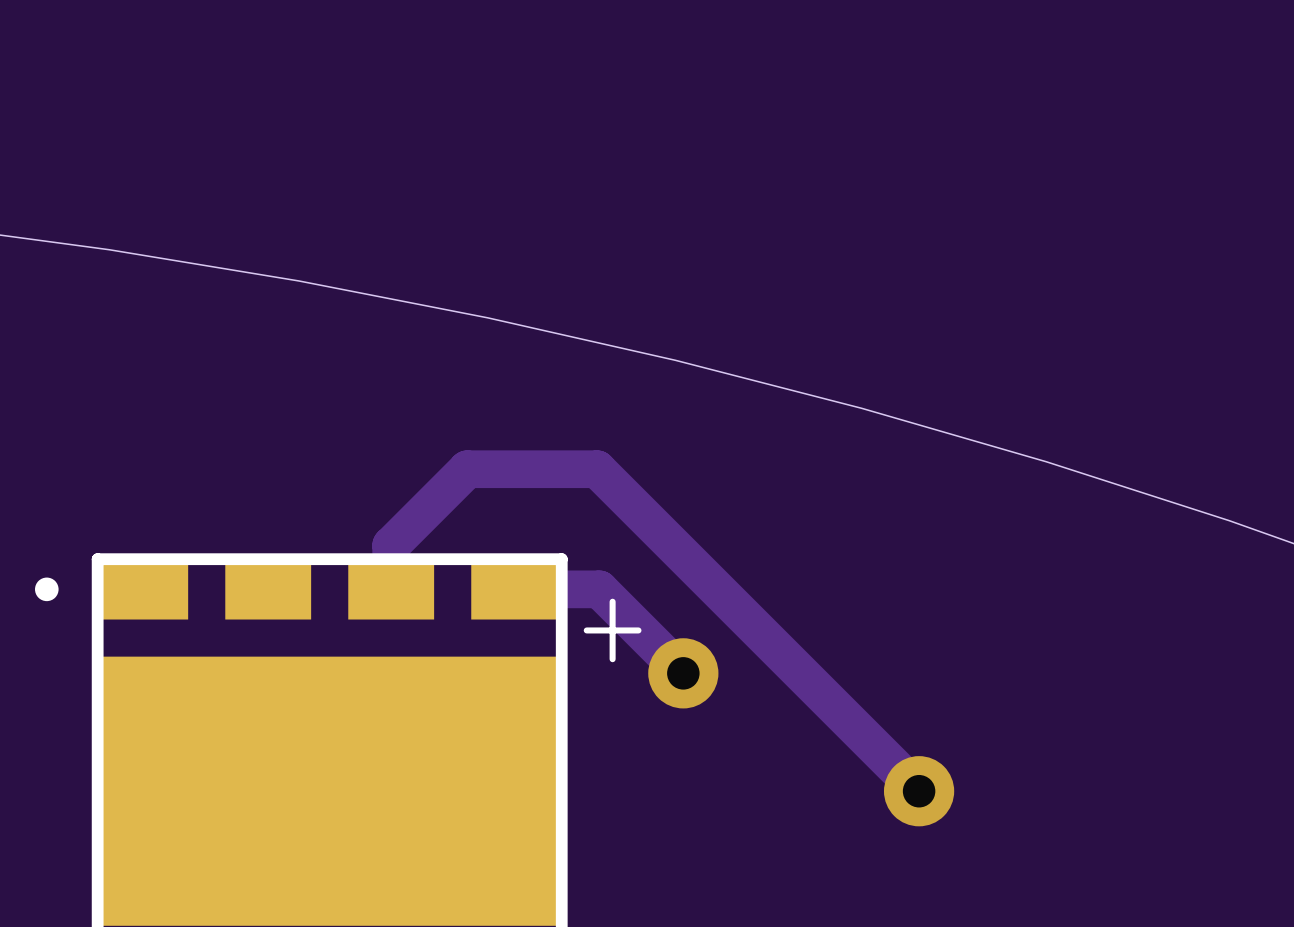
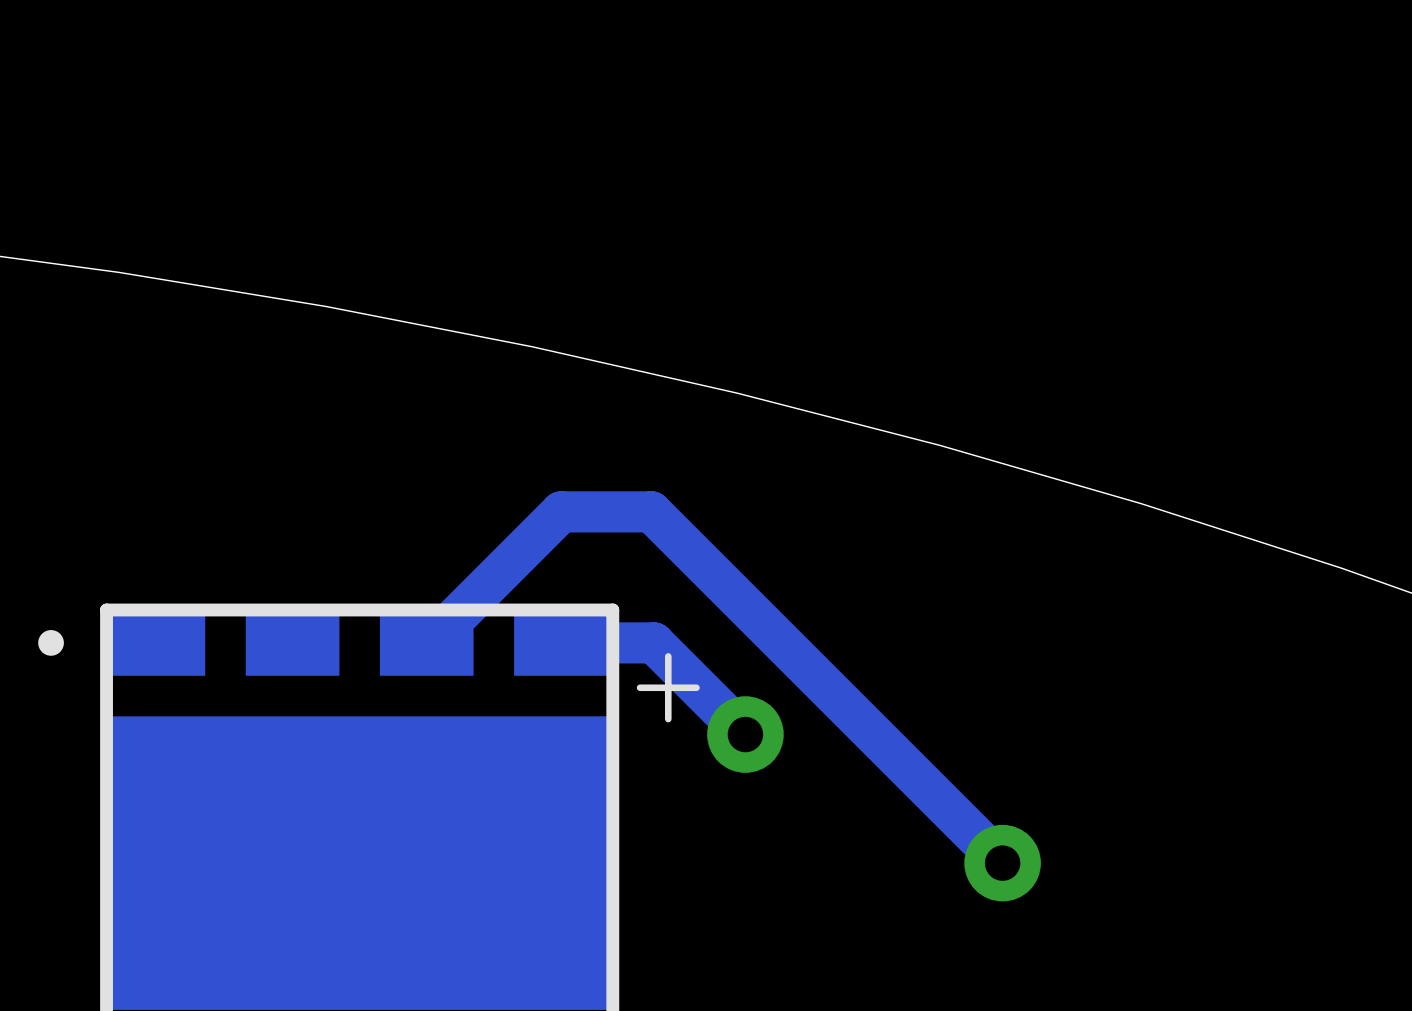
track: (514, 469) (467, 469) (391, 545) (391, 589) -> (561, 511) (430, 642) (426, 642)

